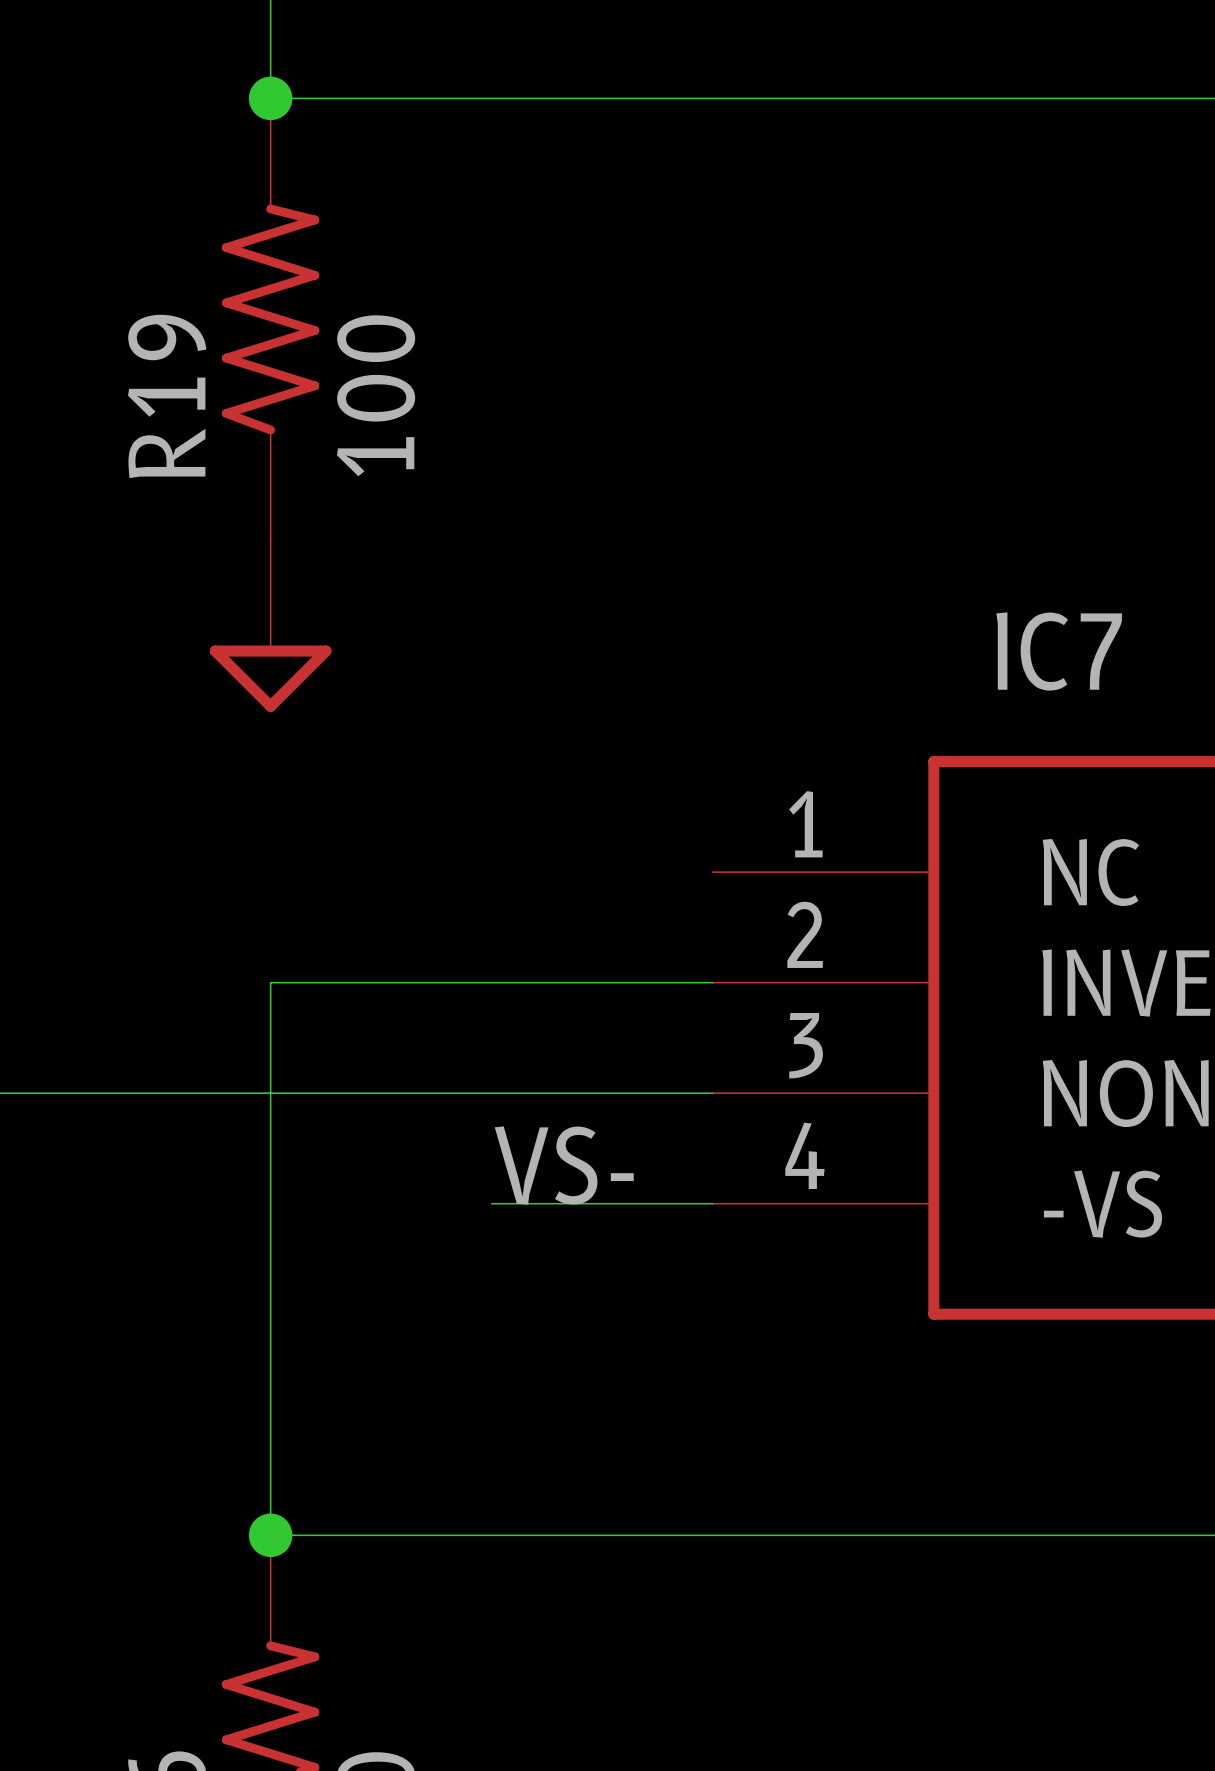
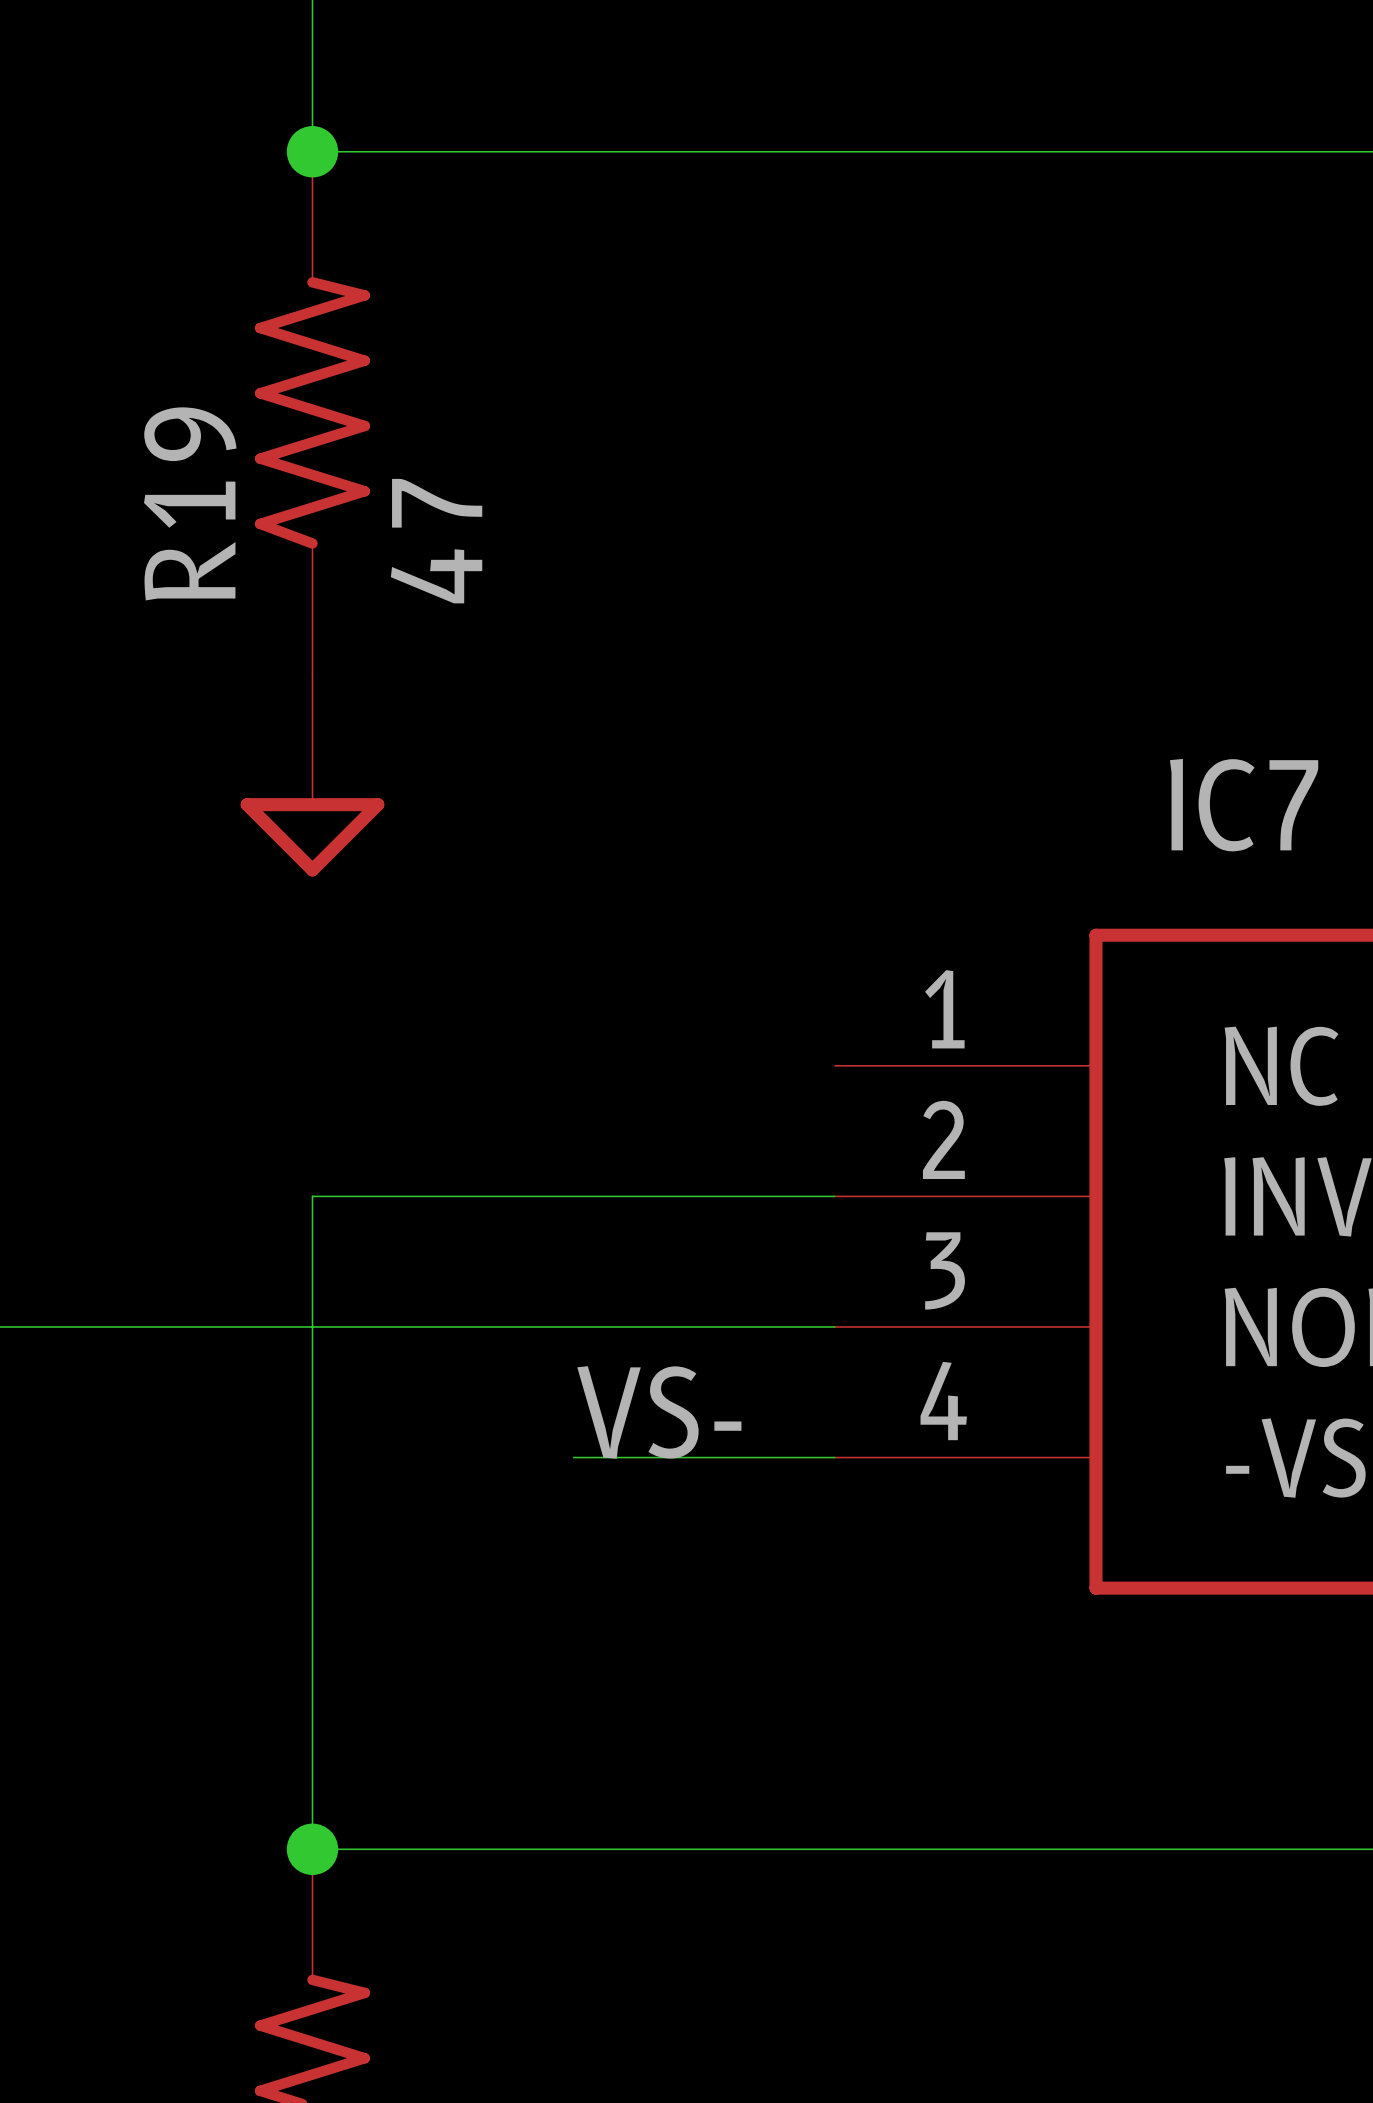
R19 value: 100 (376, 395) -> 47 (436, 541)

